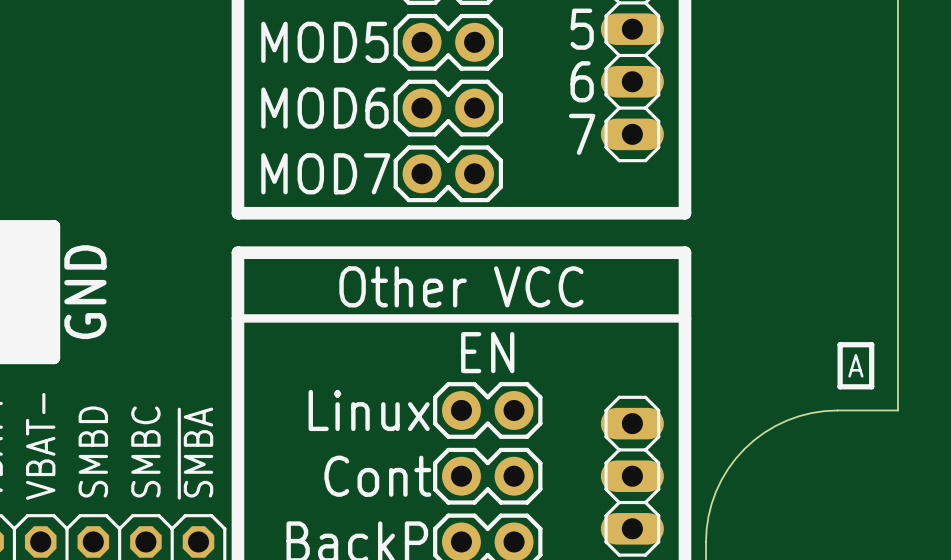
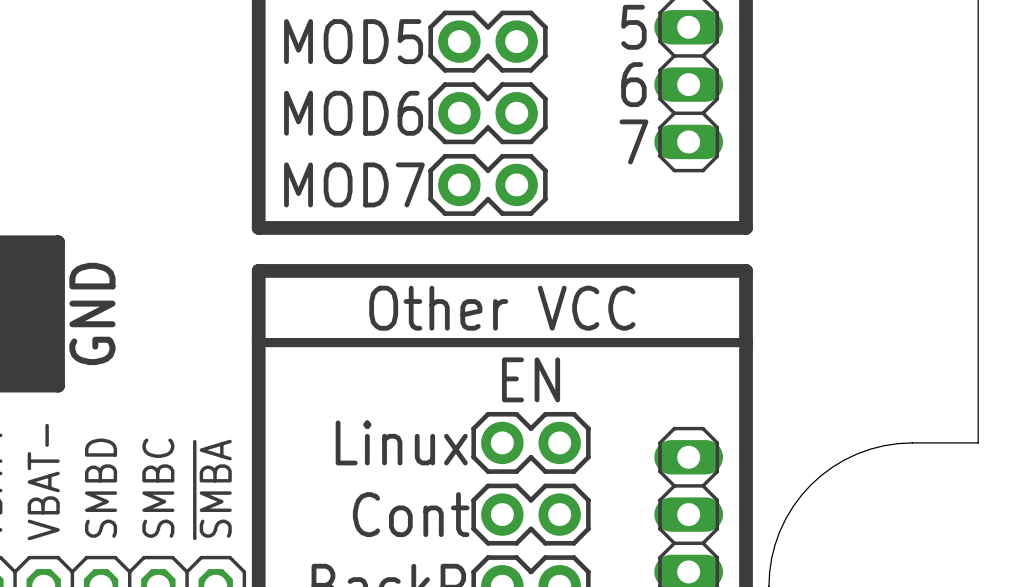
line: (840, 344) (871, 344) (871, 386) (840, 386) (840, 344) -> none
text: A (855, 365) -> none

